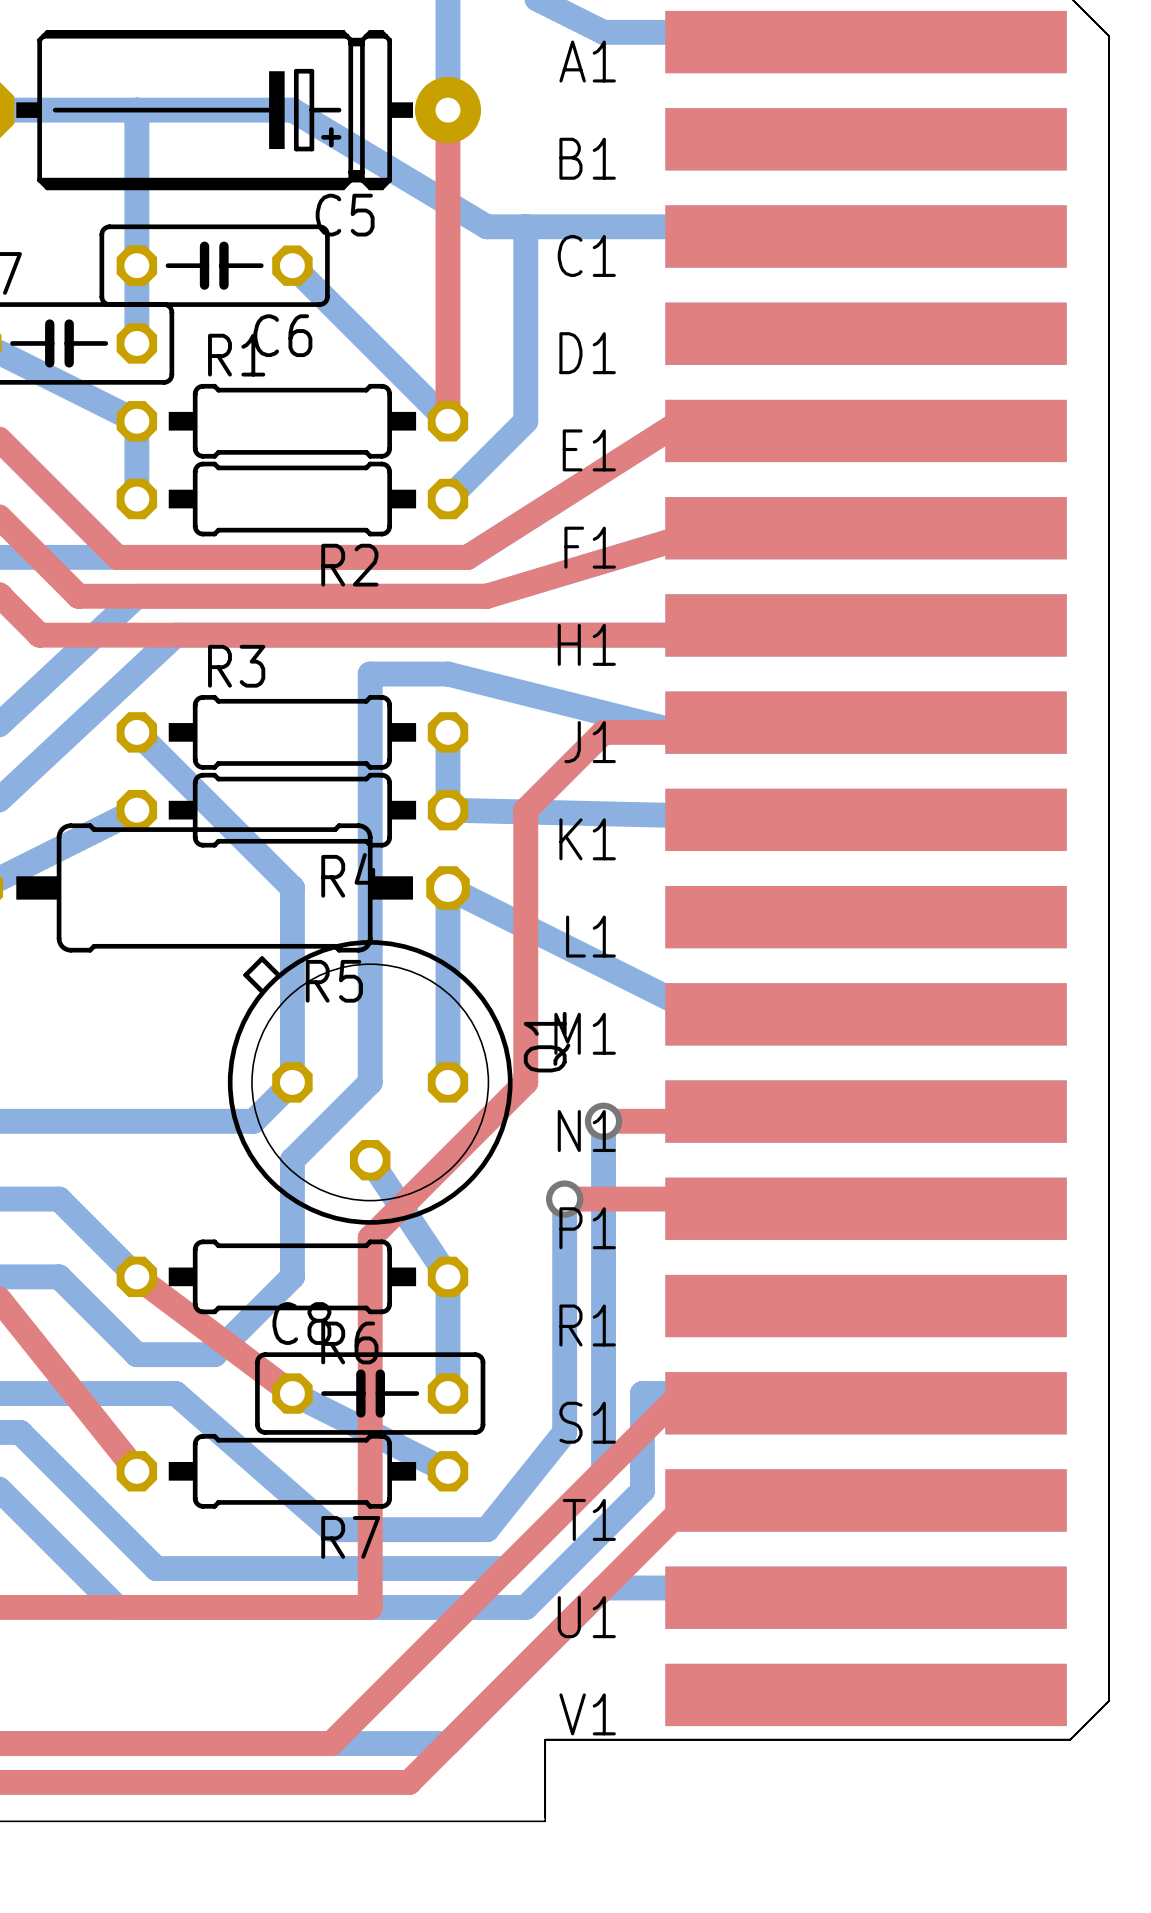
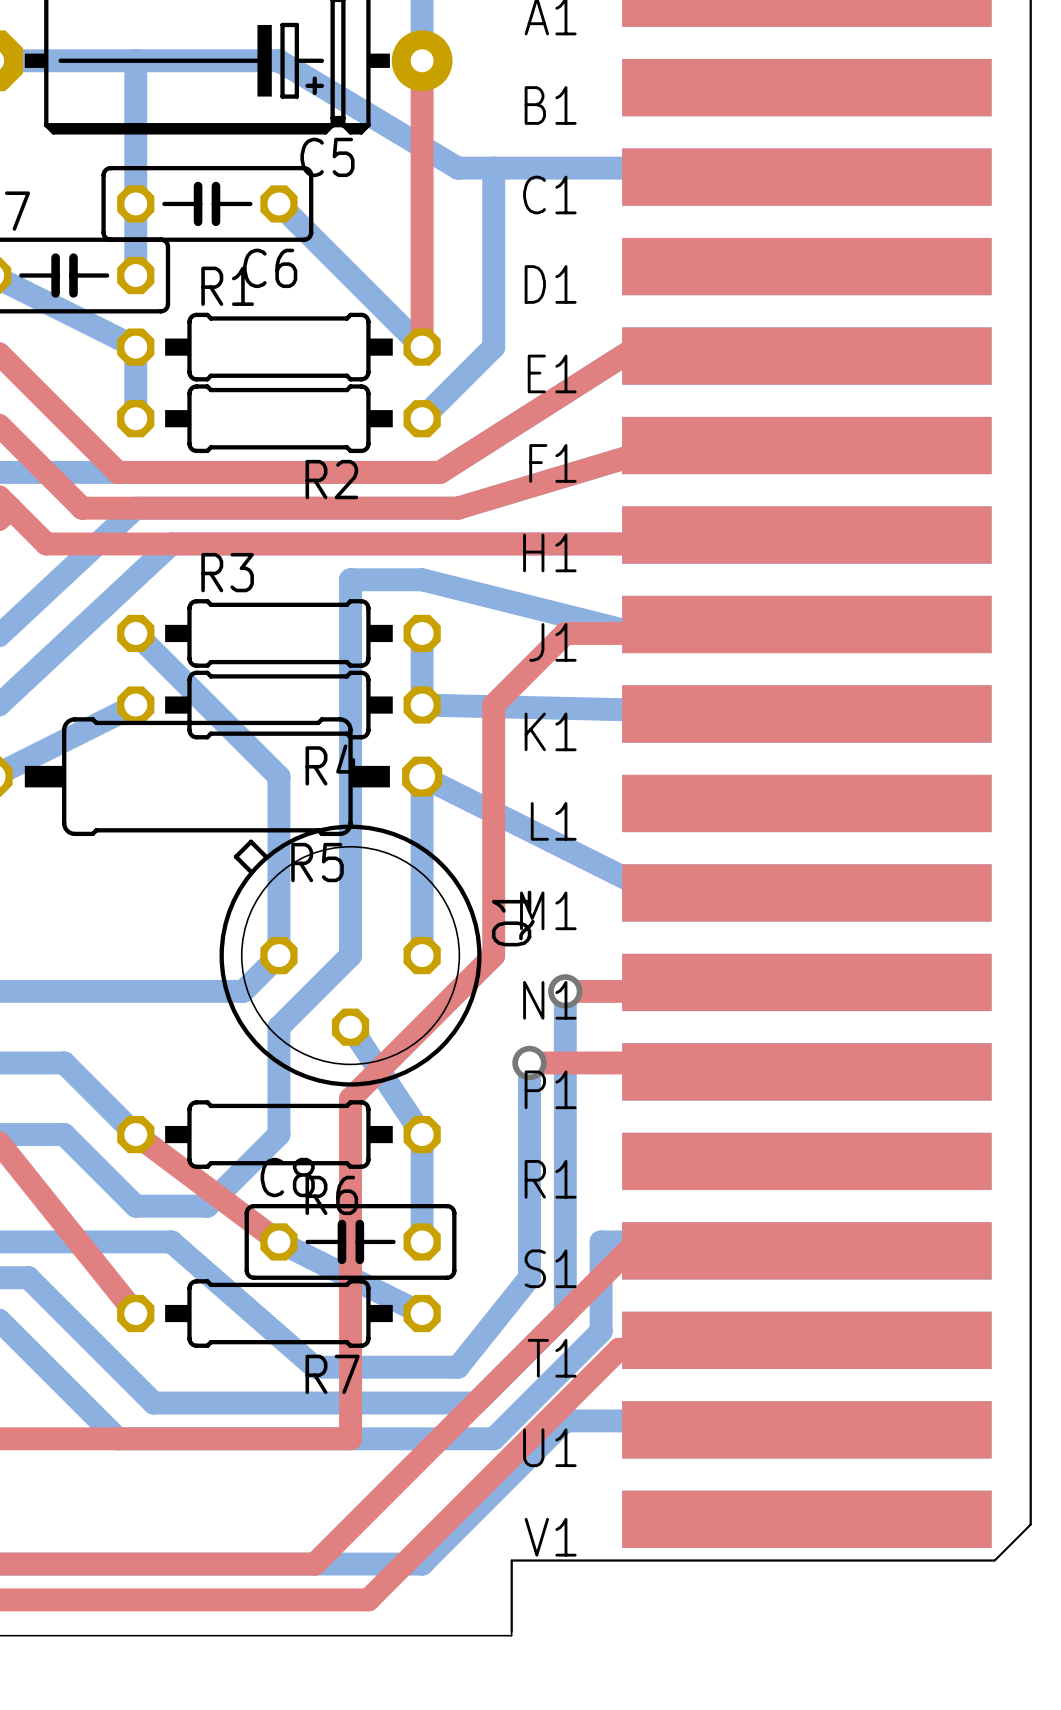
top track: (866, 1500) (681, 1510) (409, 1782) (389, 1782) -> (806, 1340) (618, 1349) (368, 1599)

